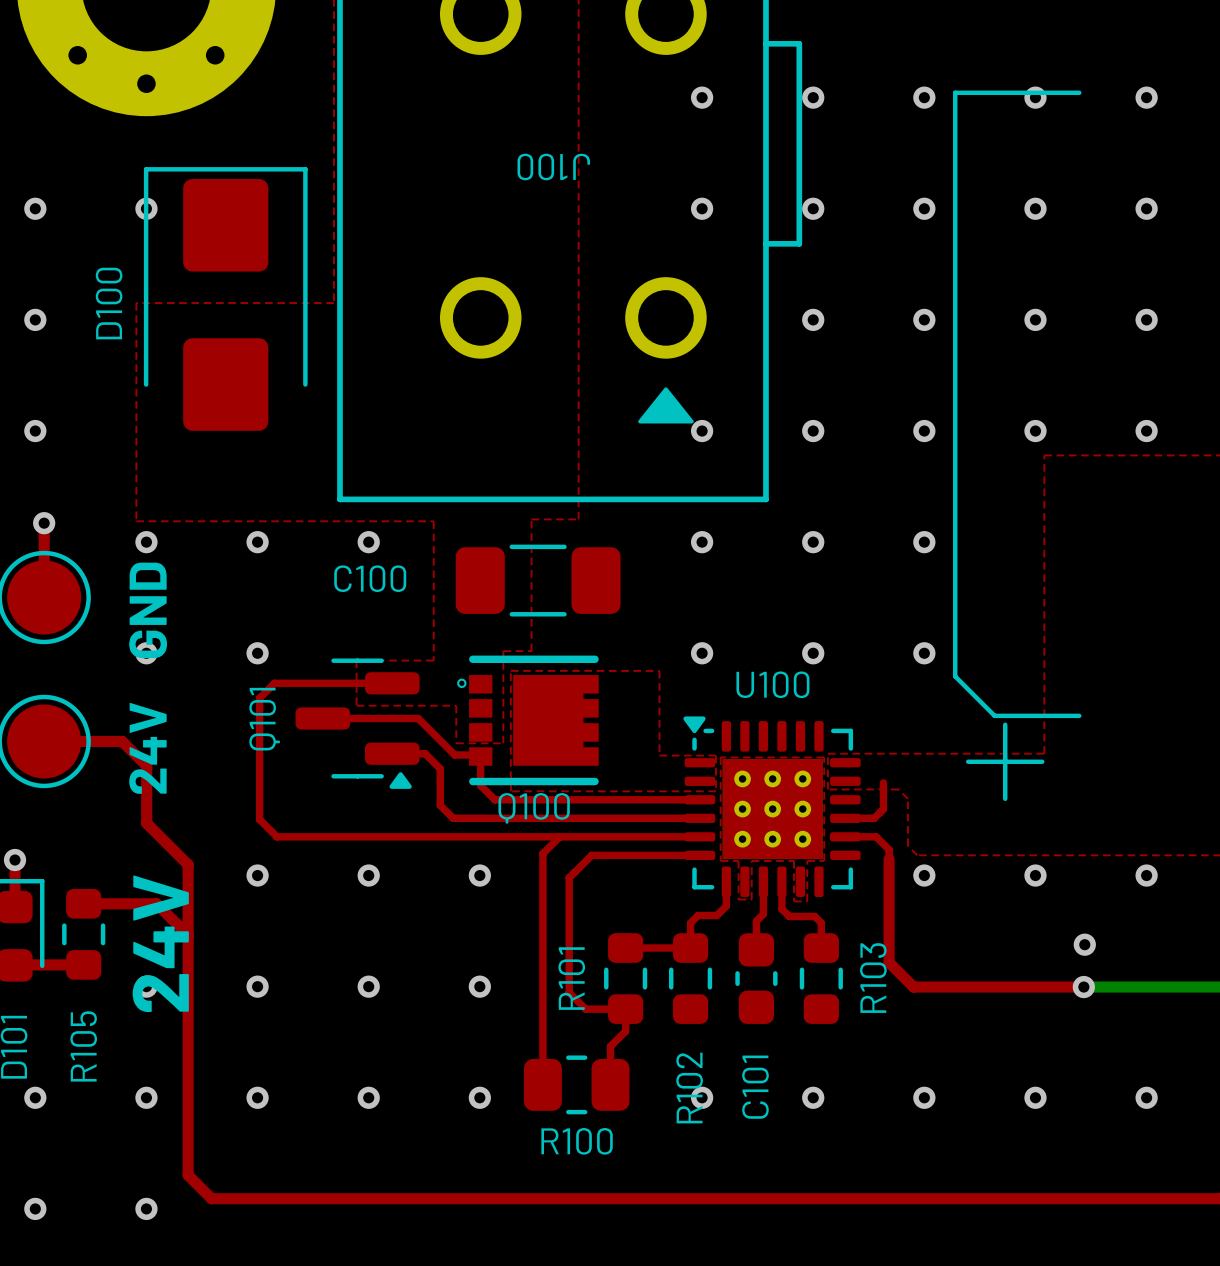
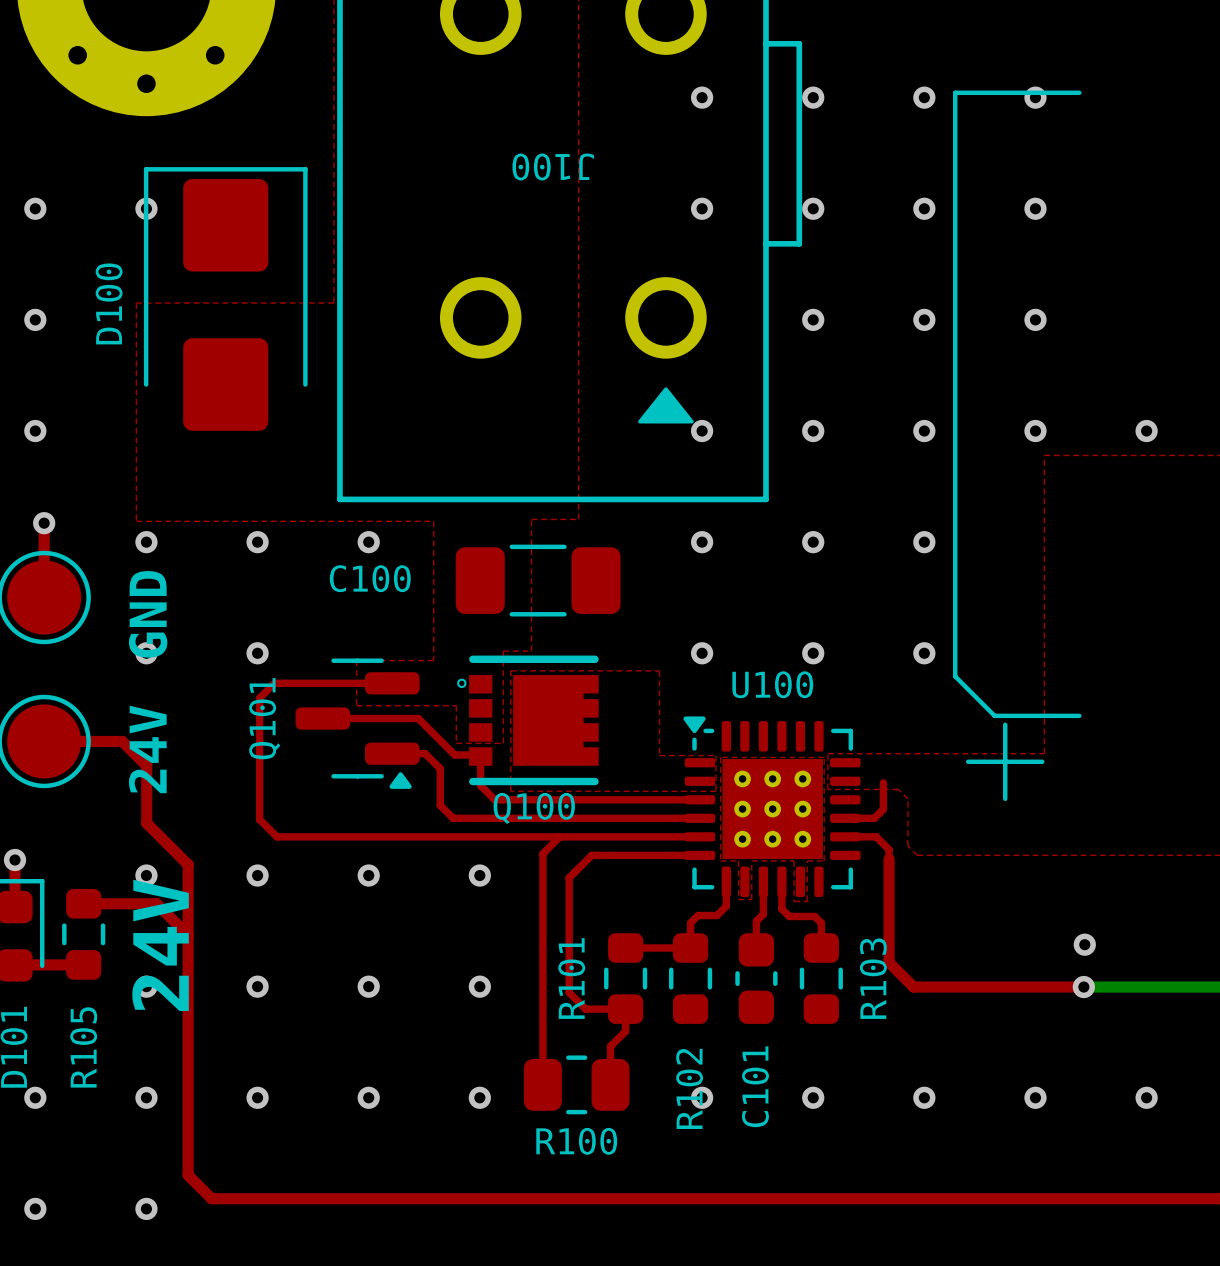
via: (1146, 97) -> none
via: (1146, 208) -> none
via: (1146, 319) -> none
via: none -> (146, 875)
via: (924, 875) -> none
via: (1035, 875) -> none
via: (1146, 875) -> none

